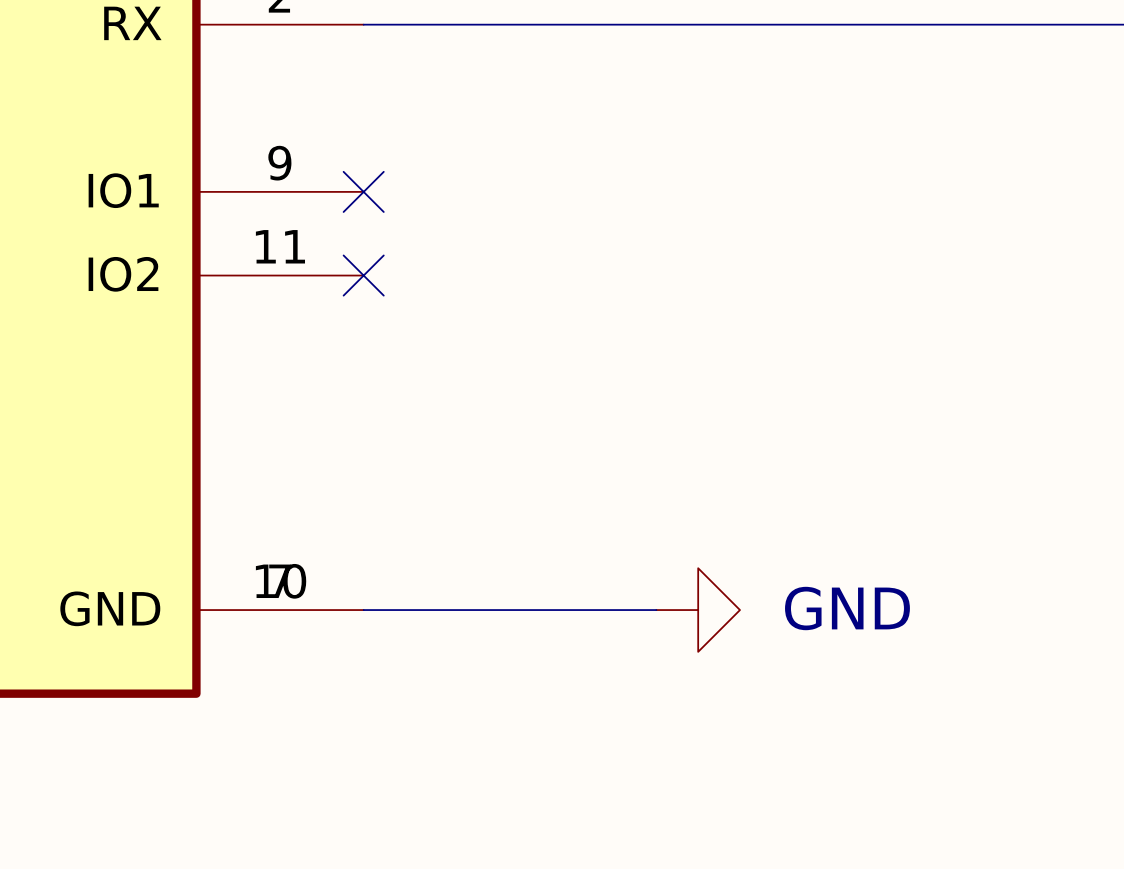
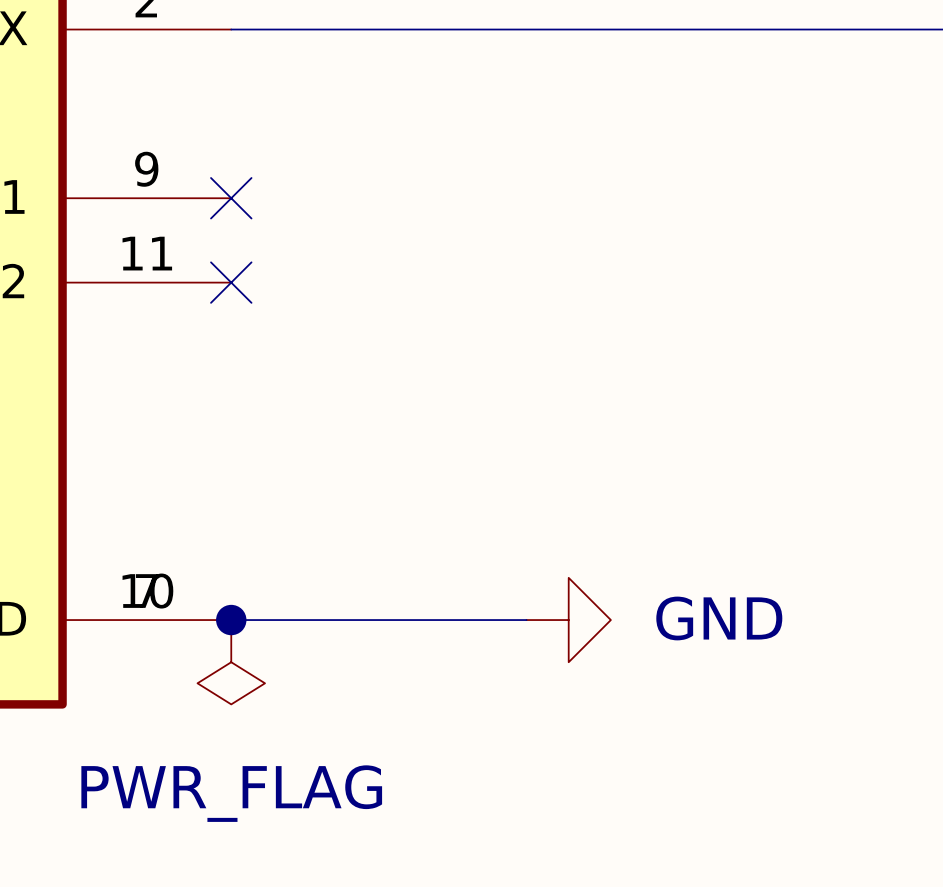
junction: none -> (231, 620)
power symbol: none -> PWR_FLAG (231, 662)

